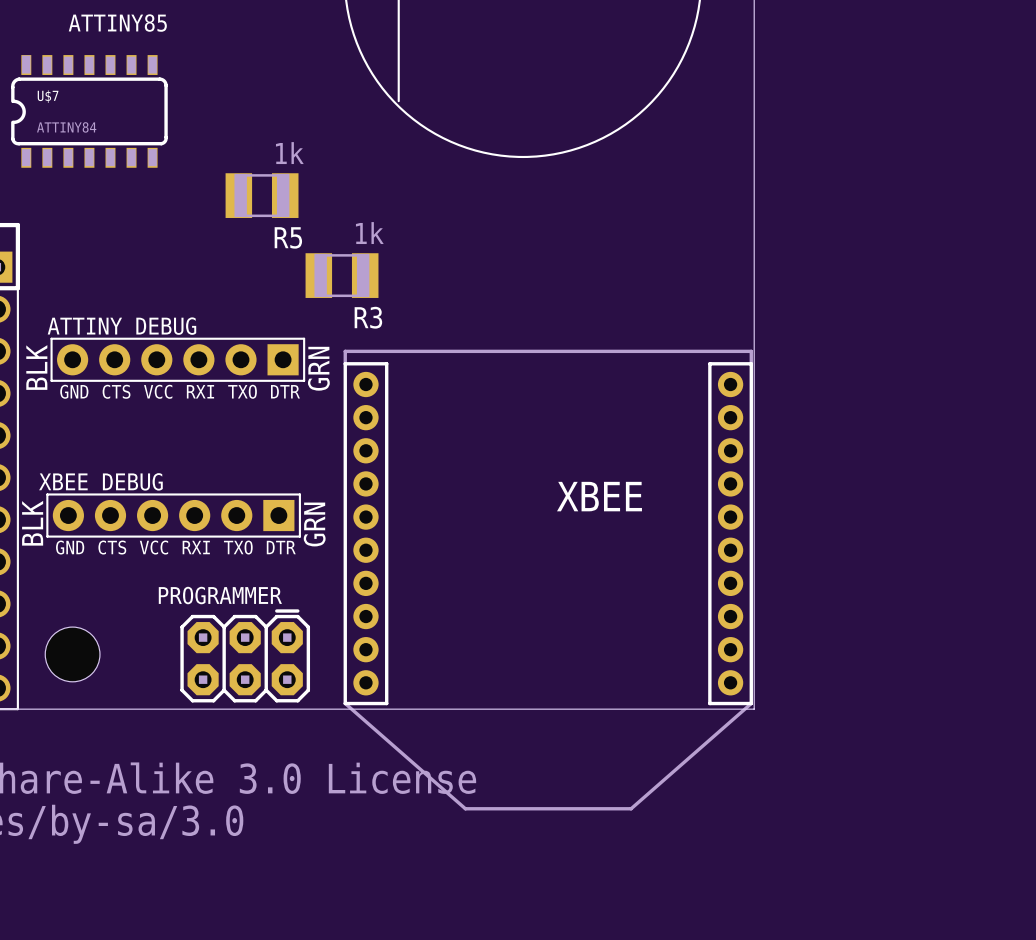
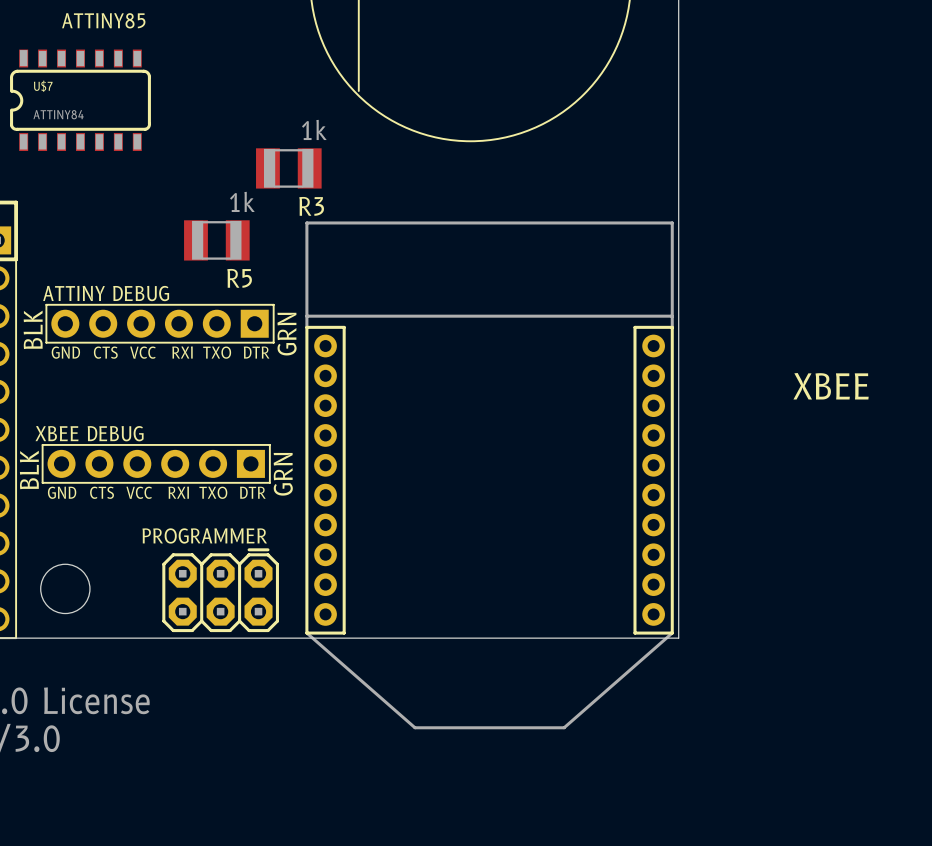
R5 position: (262, 195) -> (216, 240)
R3 position: (342, 275) -> (288, 168)
text position: XBEE (599, 496) -> XBEE (831, 386)
part: none -> (489, 475)
part: (548, 580) -> none

